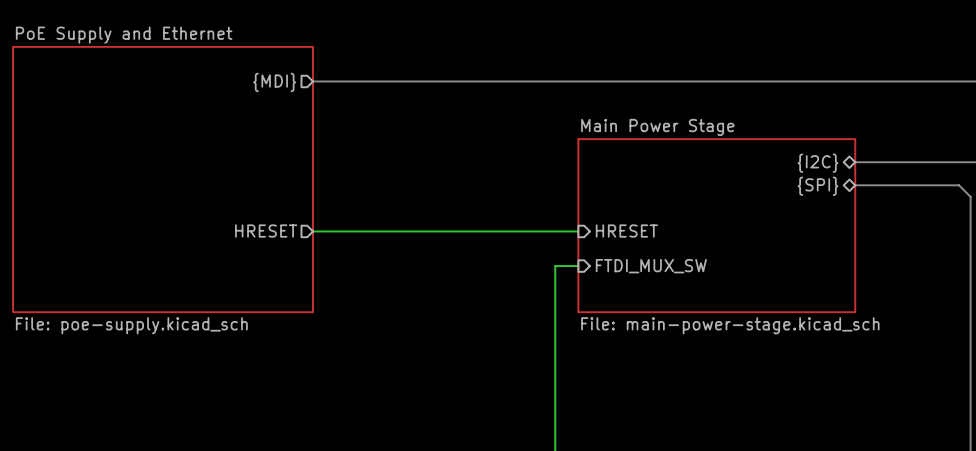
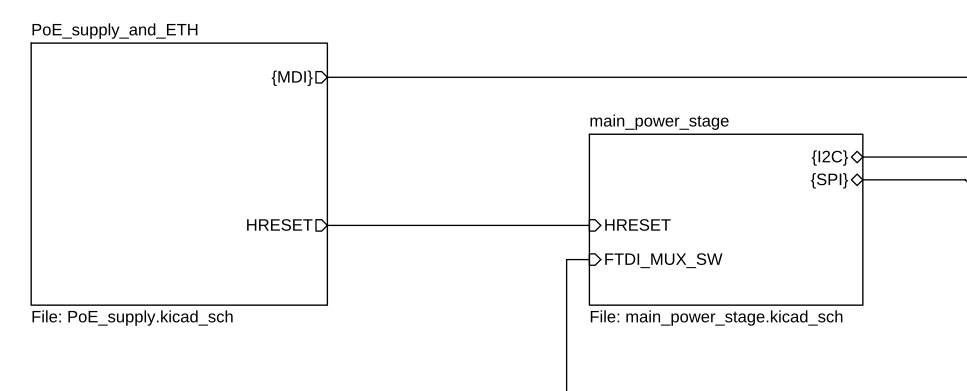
sheet PoE Supply and Ethernet name: PoE Supply and Ethernet (124, 35) -> PoE_supply_and_ETH (114, 31)
sheet Main Power Stage name: Main Power Stage (657, 127) -> main_power_stage (659, 122)
sheet PoE Supply and Ethernet value: File: poe-supply.kicad_sch (131, 325) -> File: PoE_supply.kicad_sch (132, 318)
sheet Main Power Stage value: File: main-power-stage.kicad_sch (730, 325) -> File: main_power_stage.kicad_sch (716, 318)

